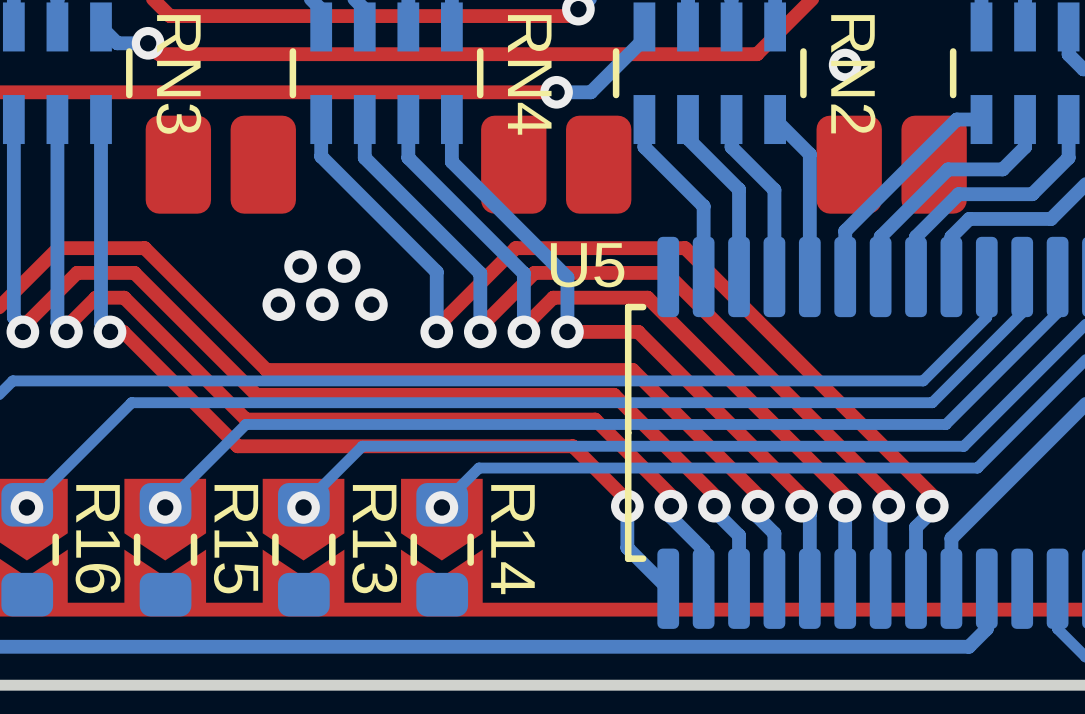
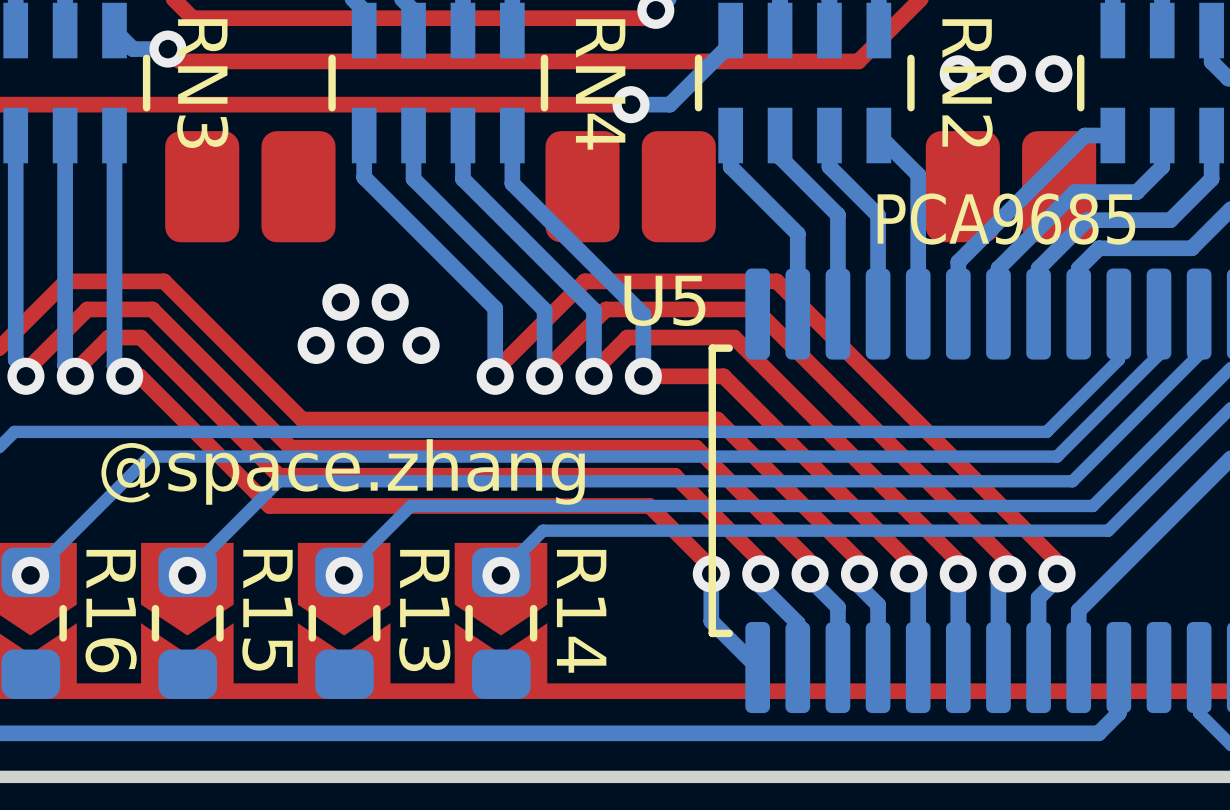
via: none -> (1007, 73)
via: none -> (1053, 73)
text: none -> PCA9685 (1006, 219)
text: none -> @space.zhang (343, 471)

